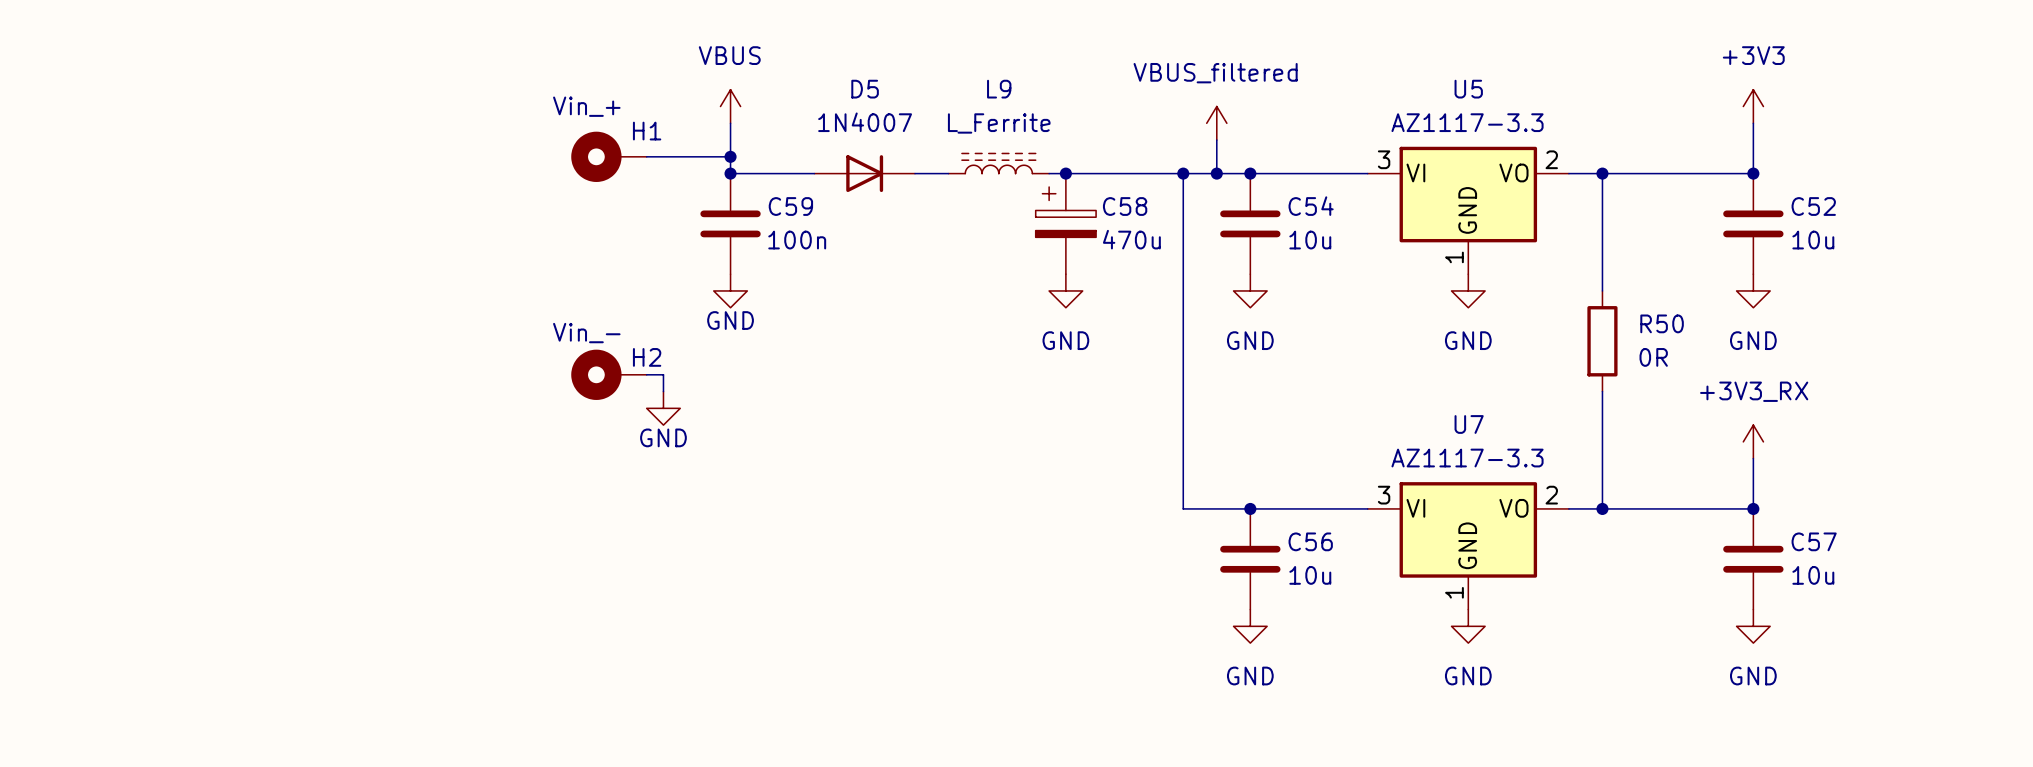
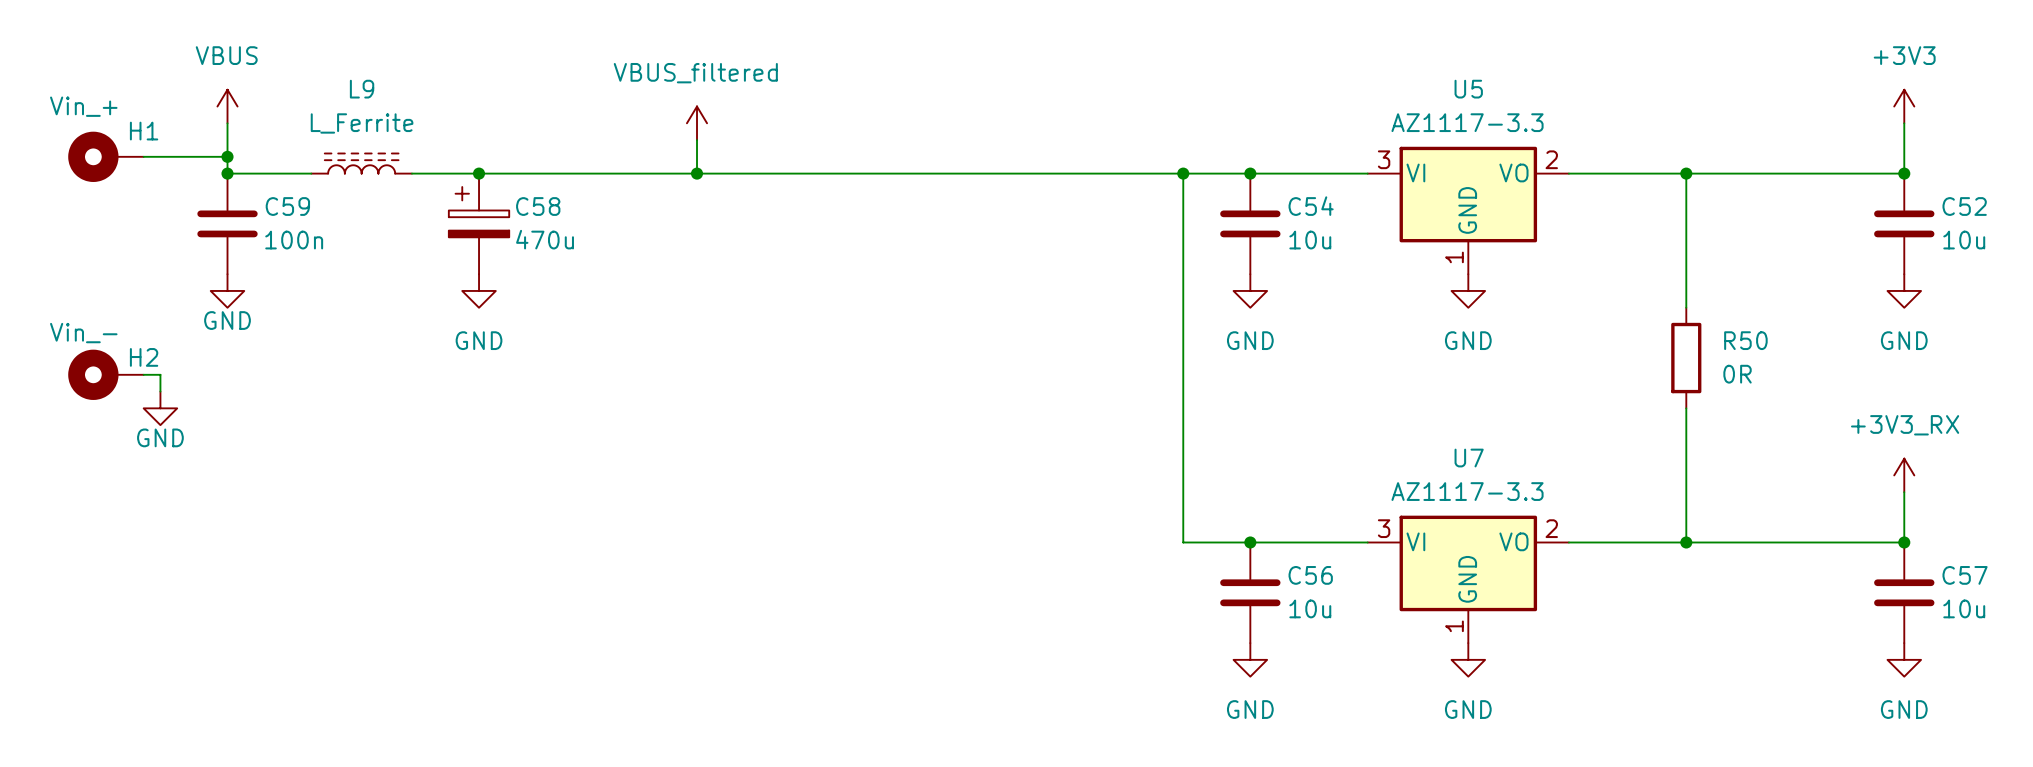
power symbol: none -> VBUS (227, 106)
power symbol: VBUS (730, 106) -> none
power symbol position: +3V3 (1753, 106) -> +3V3 (1904, 106)
wire: none -> (227, 123) (227, 173) (311, 173)
power symbol: none -> VBUS_filtered (697, 123)
wire: (730, 123) (730, 173) -> (411, 173) (730, 173)
power symbol: VBUS_filtered (1216, 123) -> none
wire: (1753, 123) (1753, 173) -> (1904, 123) (1904, 173) (1753, 173)
wire: none -> (697, 140) (697, 173)
wire: (1216, 140) (1216, 173) -> none
wire: none -> (143, 156) (227, 156)
junction: none -> (227, 156)
H1 position: (608, 156) -> (105, 156)
wire: (646, 156) (730, 156) -> none
junction: (730, 156) -> none
L9 position: (998, 163) -> (361, 163)
junction: none -> (227, 173)
junction: none -> (479, 173)
junction: none -> (697, 173)
junction: (730, 173) -> none
D5: 1N4007 (864, 173) -> none
wire: none -> (948, 173) (1049, 173)
junction: (1065, 173) -> none
junction: (1216, 173) -> none
wire: (1602, 173) (1602, 290) -> none
junction: (1602, 173) -> none
wire: none -> (1686, 173) (1686, 307)
junction: none -> (1686, 173)
junction: (1753, 173) -> none
junction: none -> (1904, 173)
C59 position: (730, 223) -> (227, 223)
C58 position: (1065, 223) -> (479, 223)
C52 position: (1753, 223) -> (1904, 223)
power symbol: none -> GND (227, 290)
power symbol: none -> GND (479, 290)
power symbol: GND (730, 290) -> none
power symbol: GND (1065, 290) -> none
power symbol position: GND (1753, 290) -> GND (1904, 290)
R50 position: (1602, 341) -> (1686, 358)
wire: none -> (143, 374) (160, 374) (160, 391)
H2 position: (608, 374) -> (105, 374)
wire: (646, 374) (663, 374) (663, 391) -> none
wire: (1602, 391) (1602, 508) -> none
power symbol: none -> GND (160, 408)
power symbol: GND (663, 408) -> none
wire: none -> (1686, 408) (1686, 542)
power symbol position: +3V3_RX (1753, 441) -> +3V3_RX (1904, 475)
wire: (1753, 458) (1753, 508) (1568, 508) -> none
wire: none -> (1904, 492) (1904, 542) (1568, 542)
wire: (1183, 508) (1367, 508) -> (1183, 508) (1183, 542) (1367, 542)
junction position: (1250, 508) -> (1250, 542)
junction: (1602, 508) -> none
junction: (1753, 508) -> none
junction: none -> (1686, 542)
junction: none -> (1904, 542)
U7 position: (1468, 545) -> (1468, 579)
C56 position: (1250, 559) -> (1250, 592)
C57 position: (1753, 559) -> (1904, 592)
power symbol position: GND (1250, 626) -> GND (1250, 659)
power symbol position: GND (1468, 626) -> GND (1468, 659)
power symbol: GND (1753, 626) -> none
power symbol: none -> GND (1904, 659)

